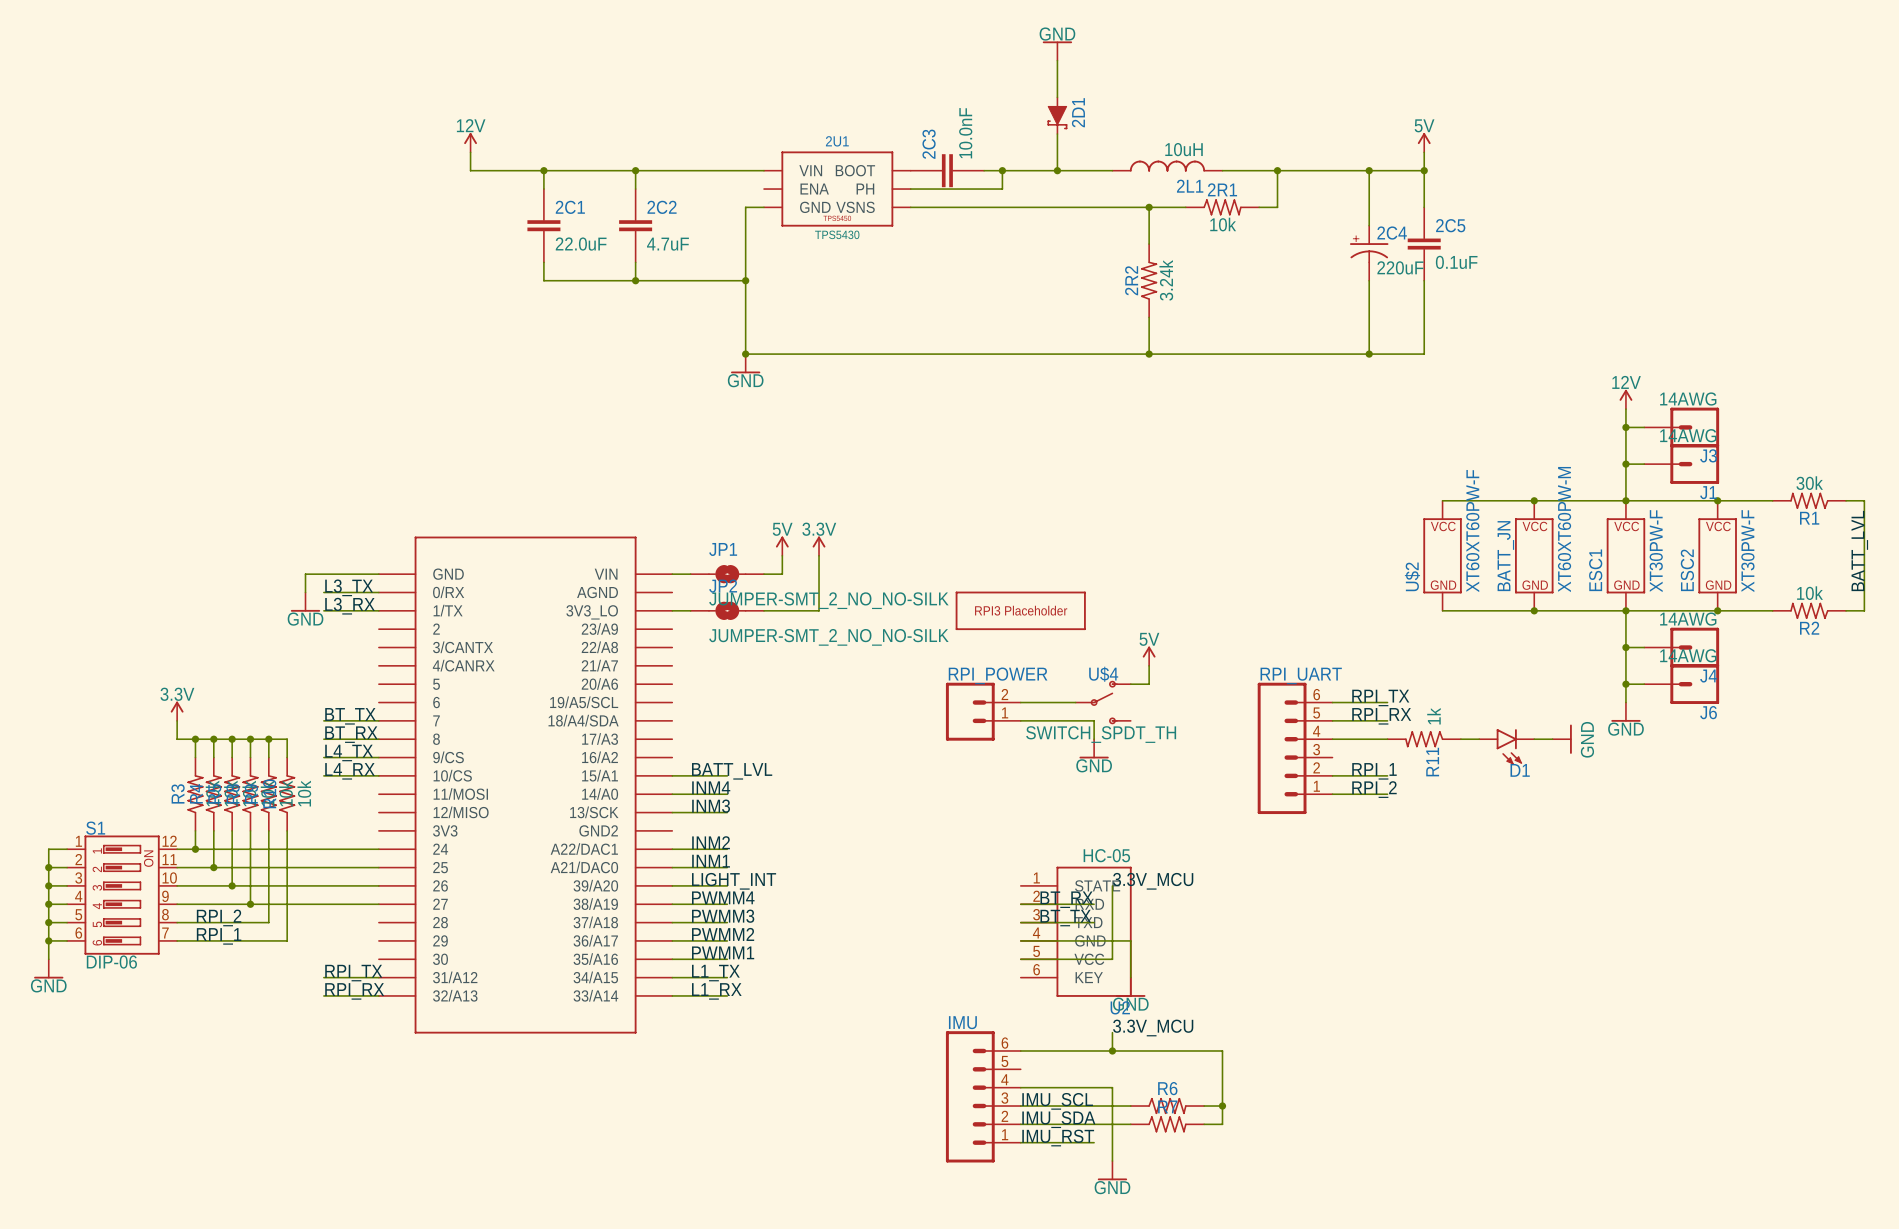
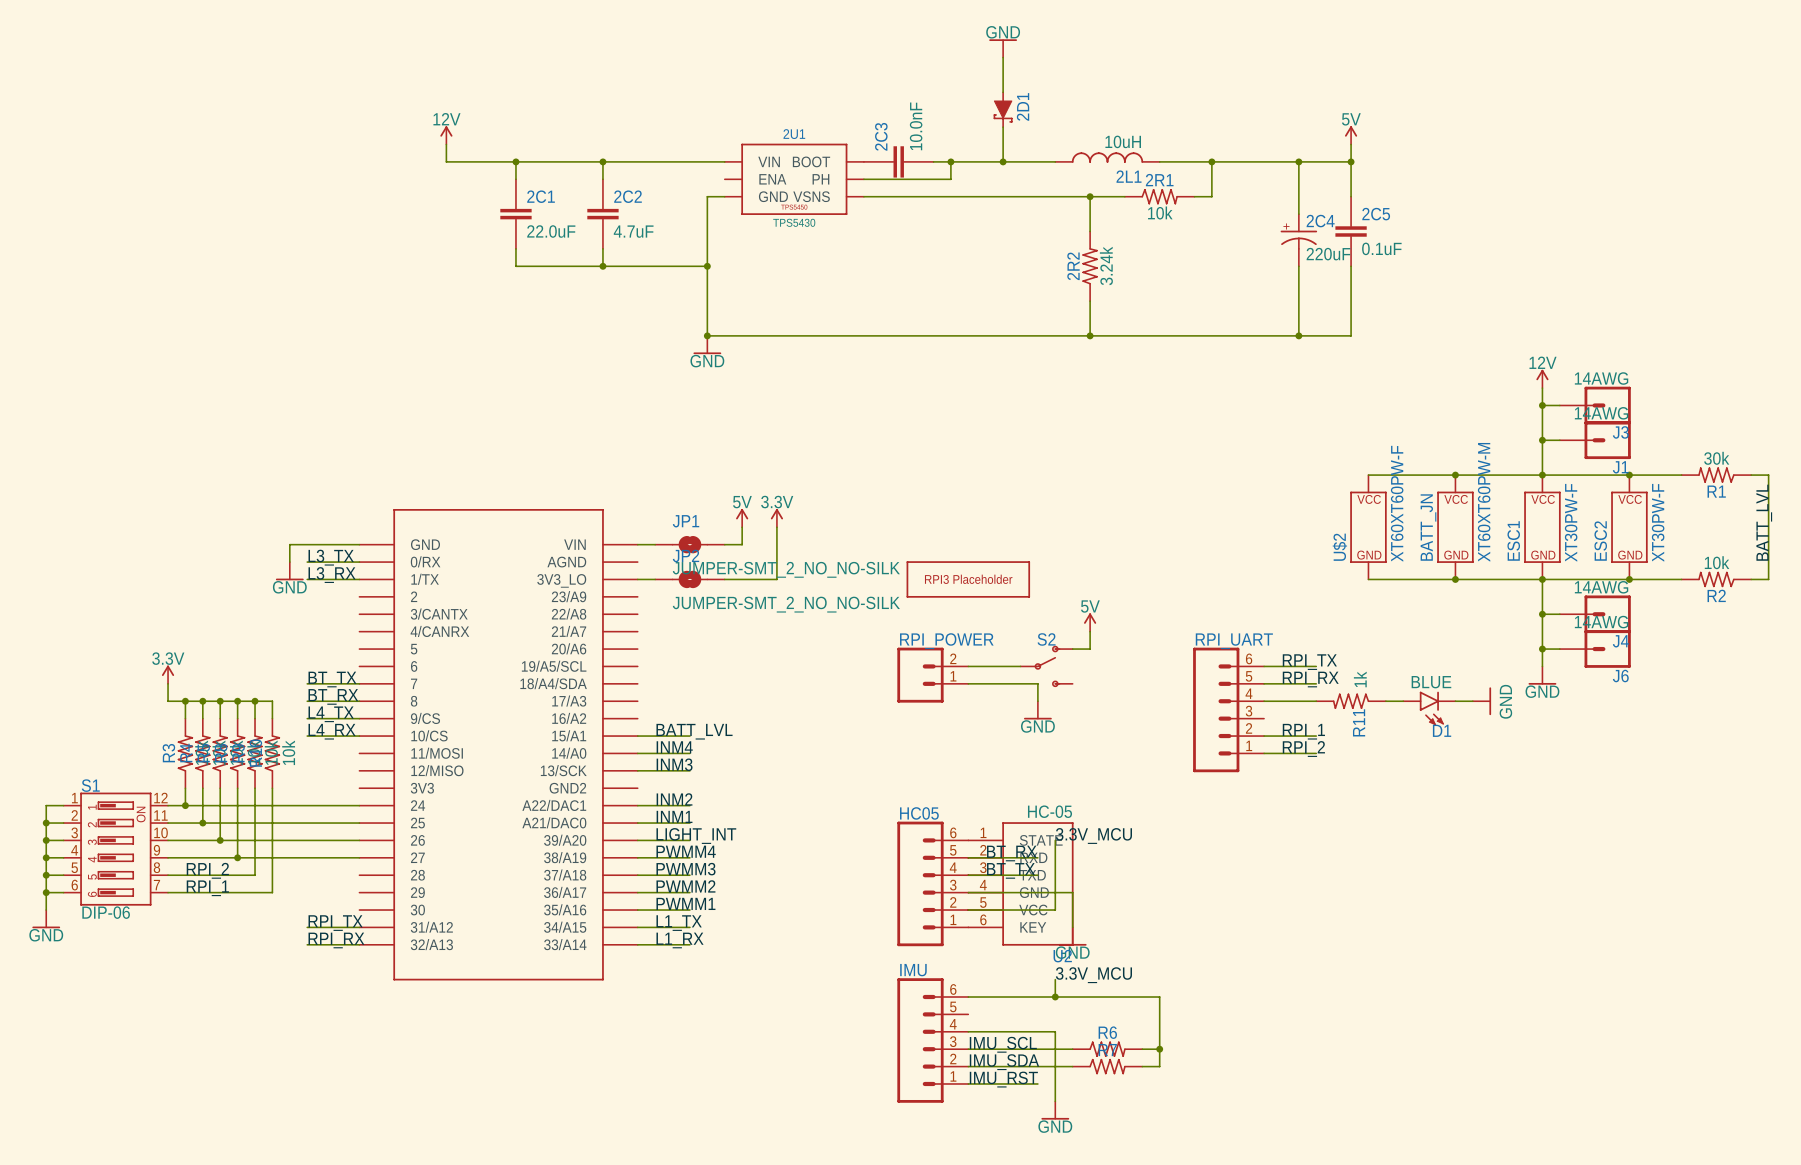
U$4 name: U$4 (1103, 674) -> S2 (1046, 639)
D1 value: none -> BLUE (1431, 682)
U$4 value: SWITCH_SPDT_TH (1101, 734) -> none
HC05: none -> (932, 883)

